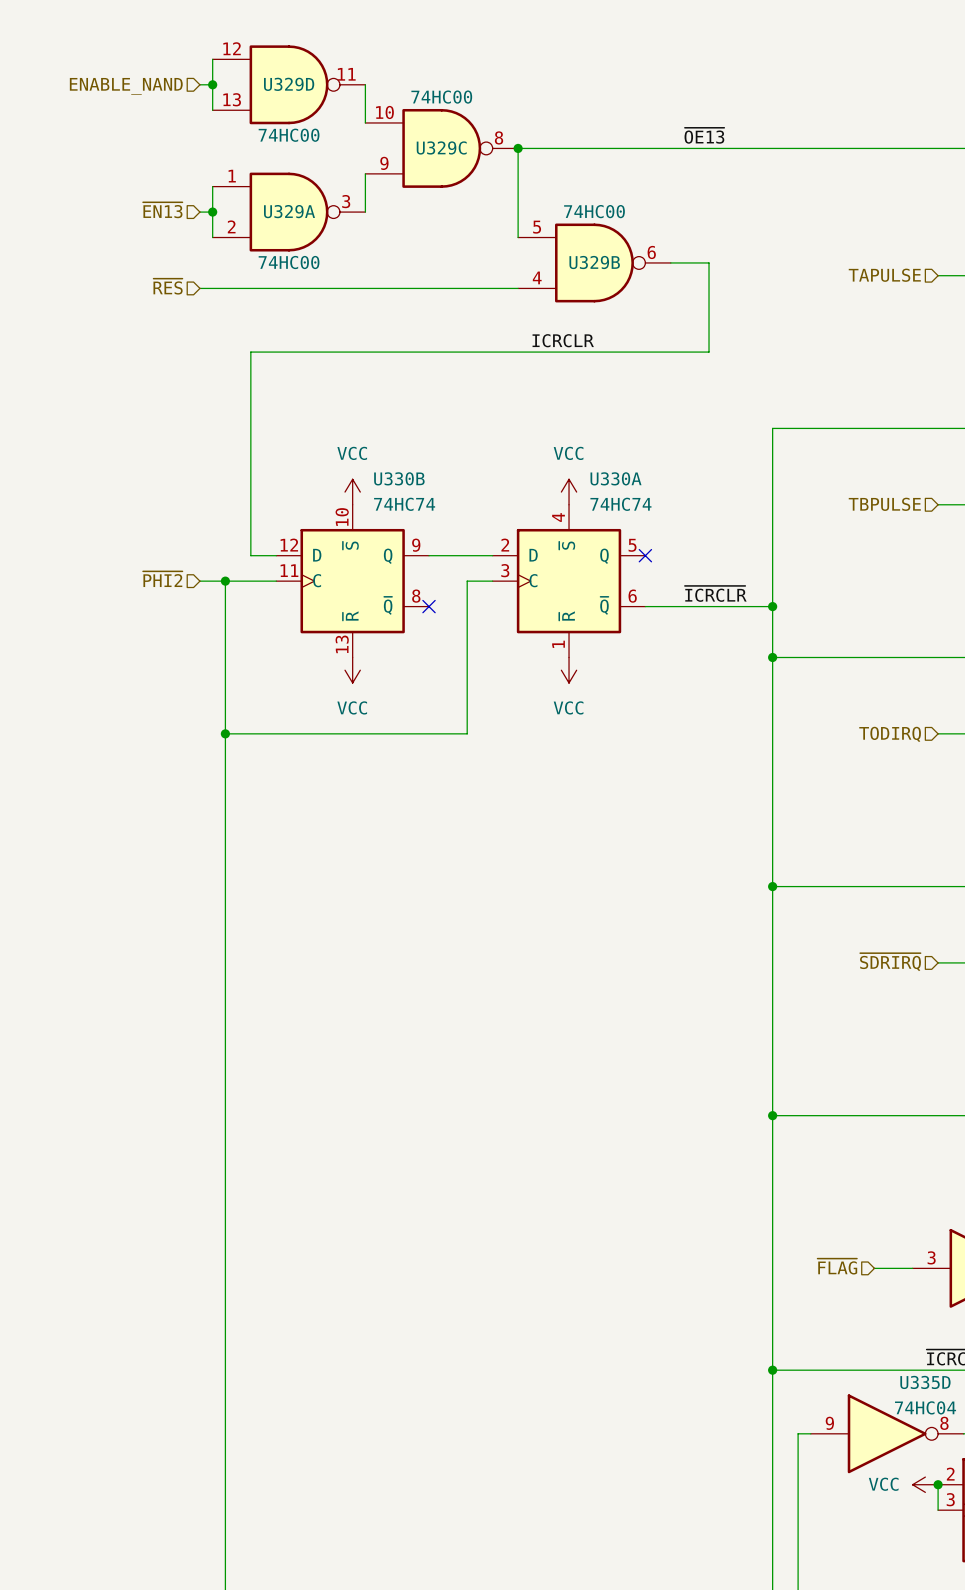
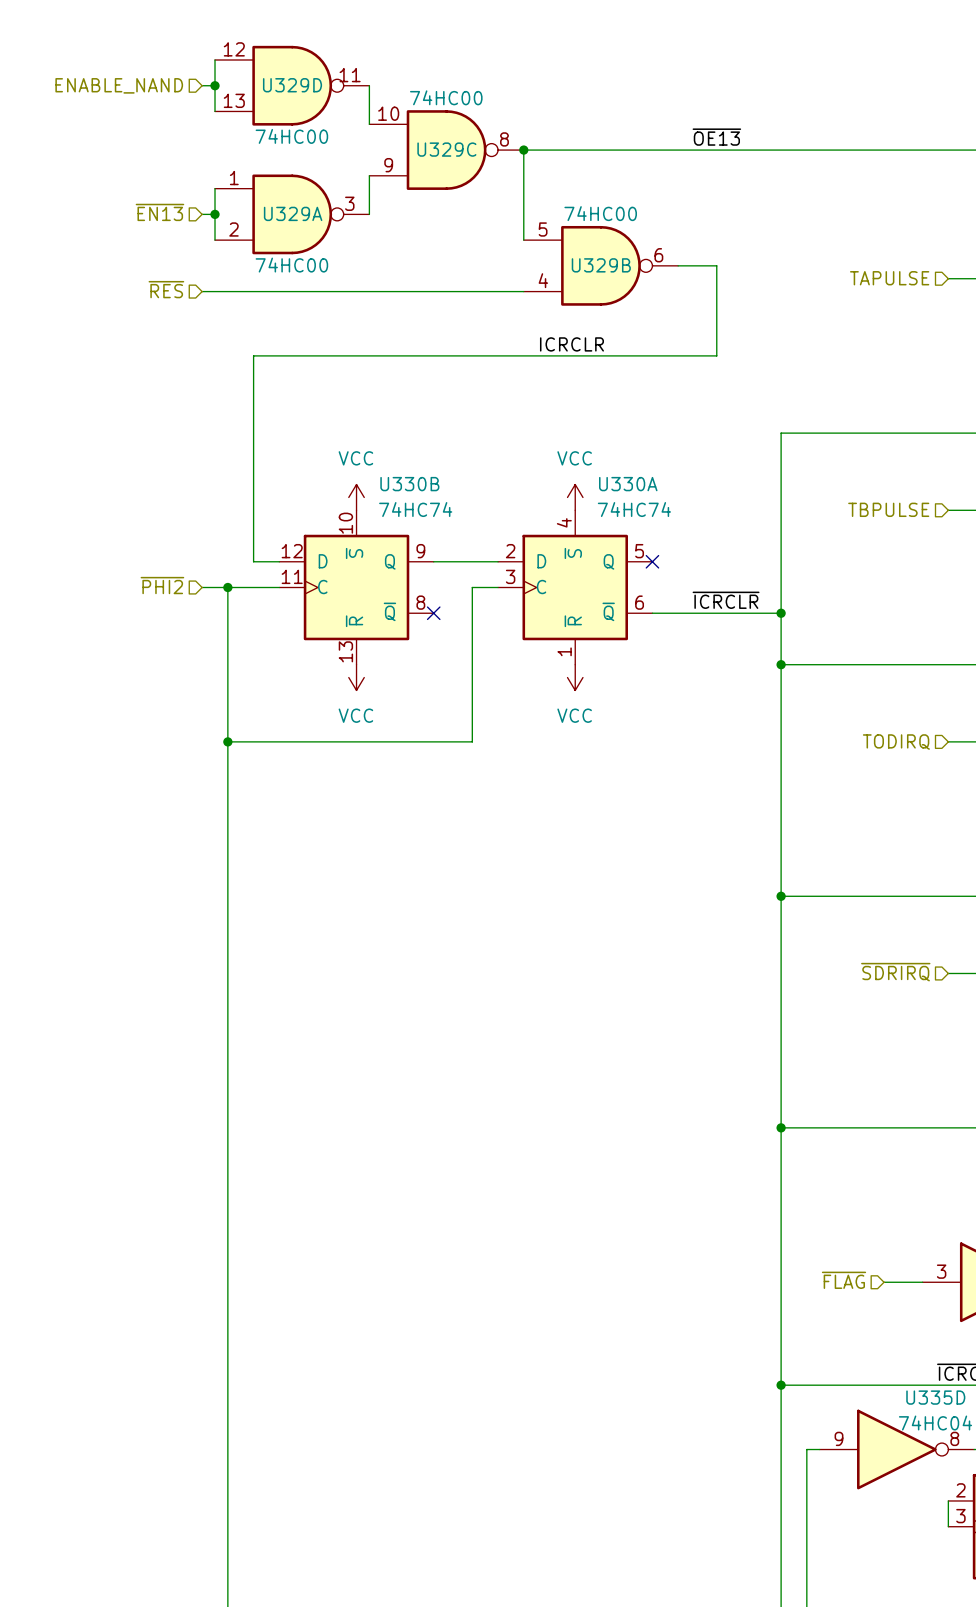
power symbol: VCC (925, 1484) -> none
junction: (938, 1484) -> none

